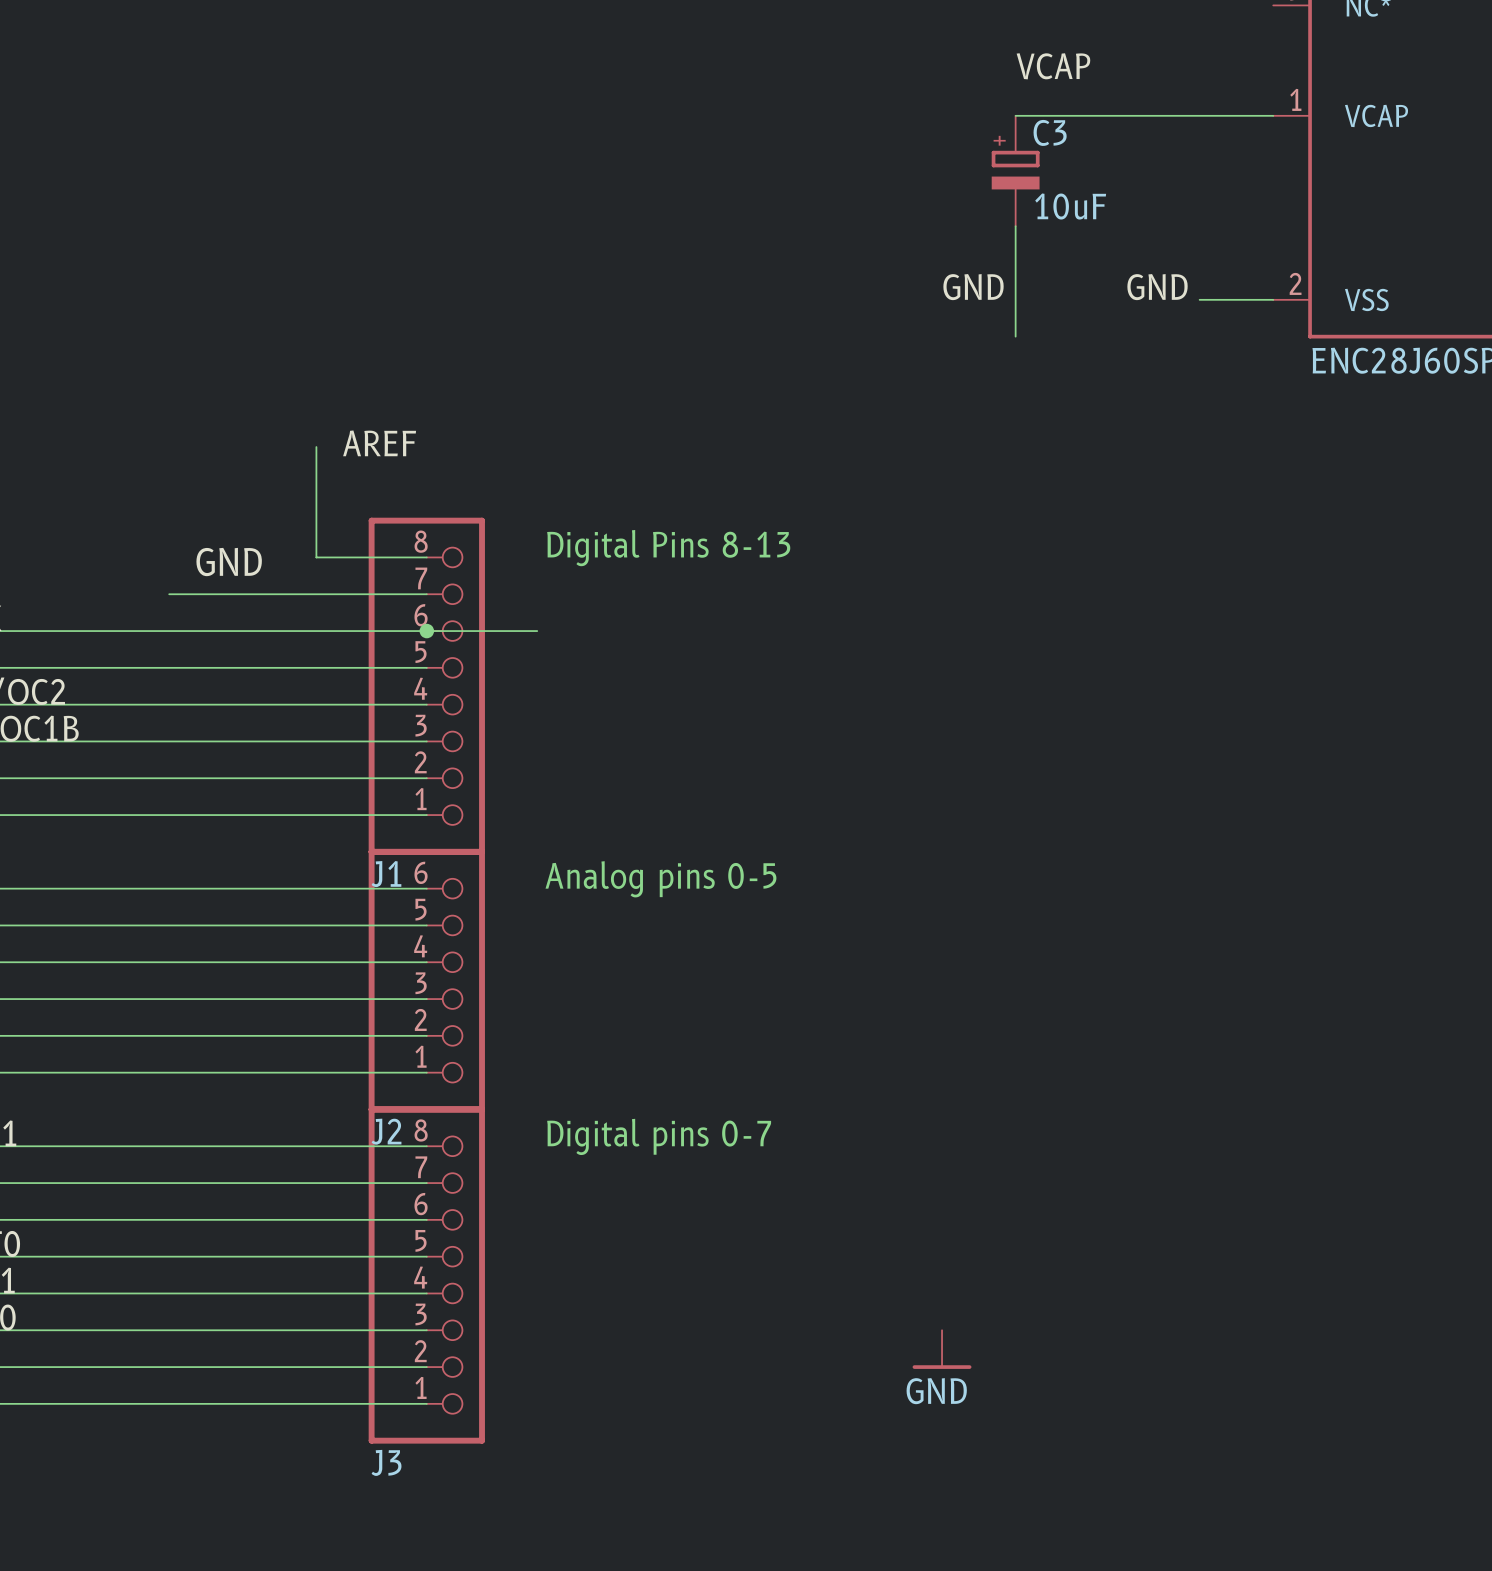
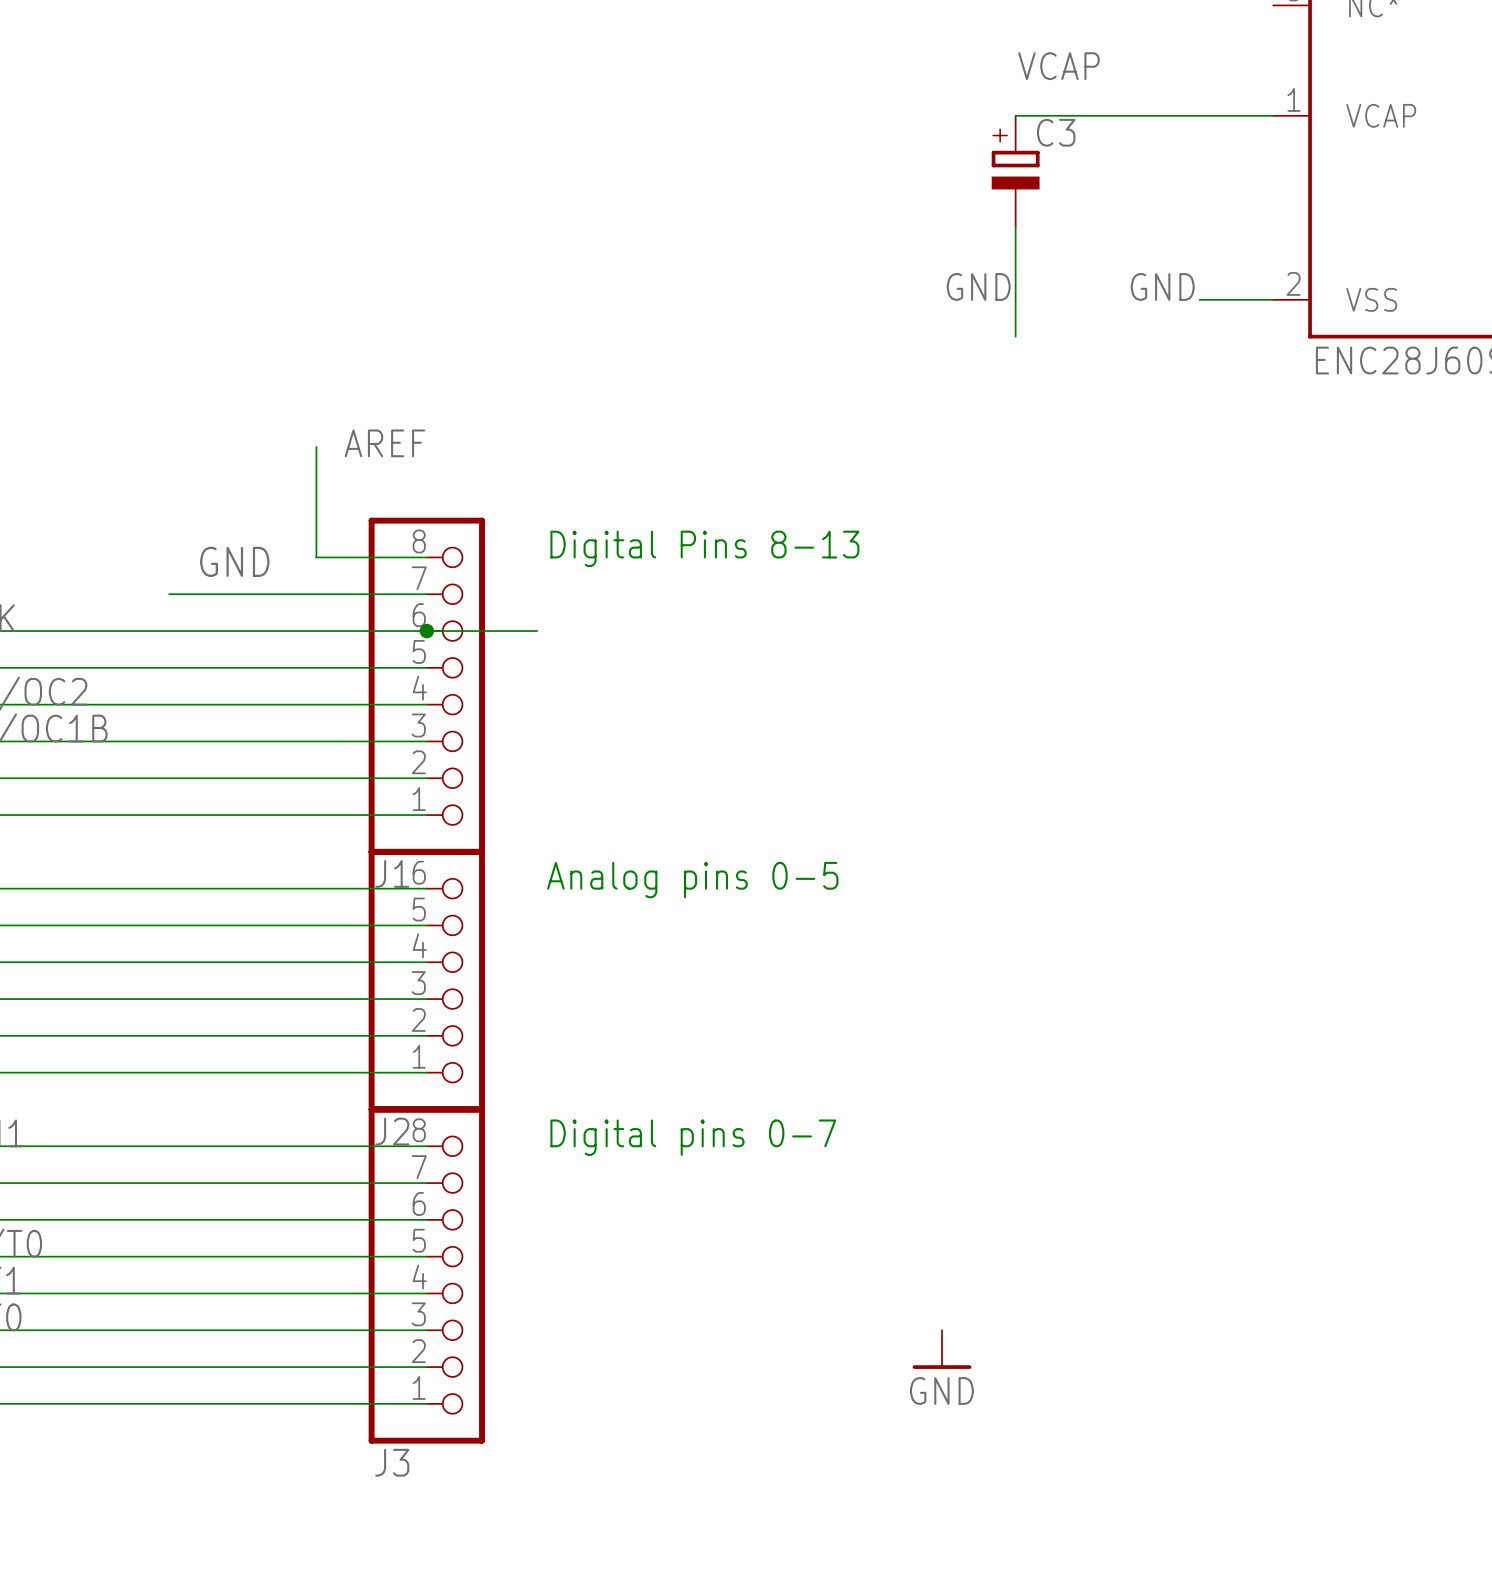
C3 value: 10uF (1070, 206) -> none

